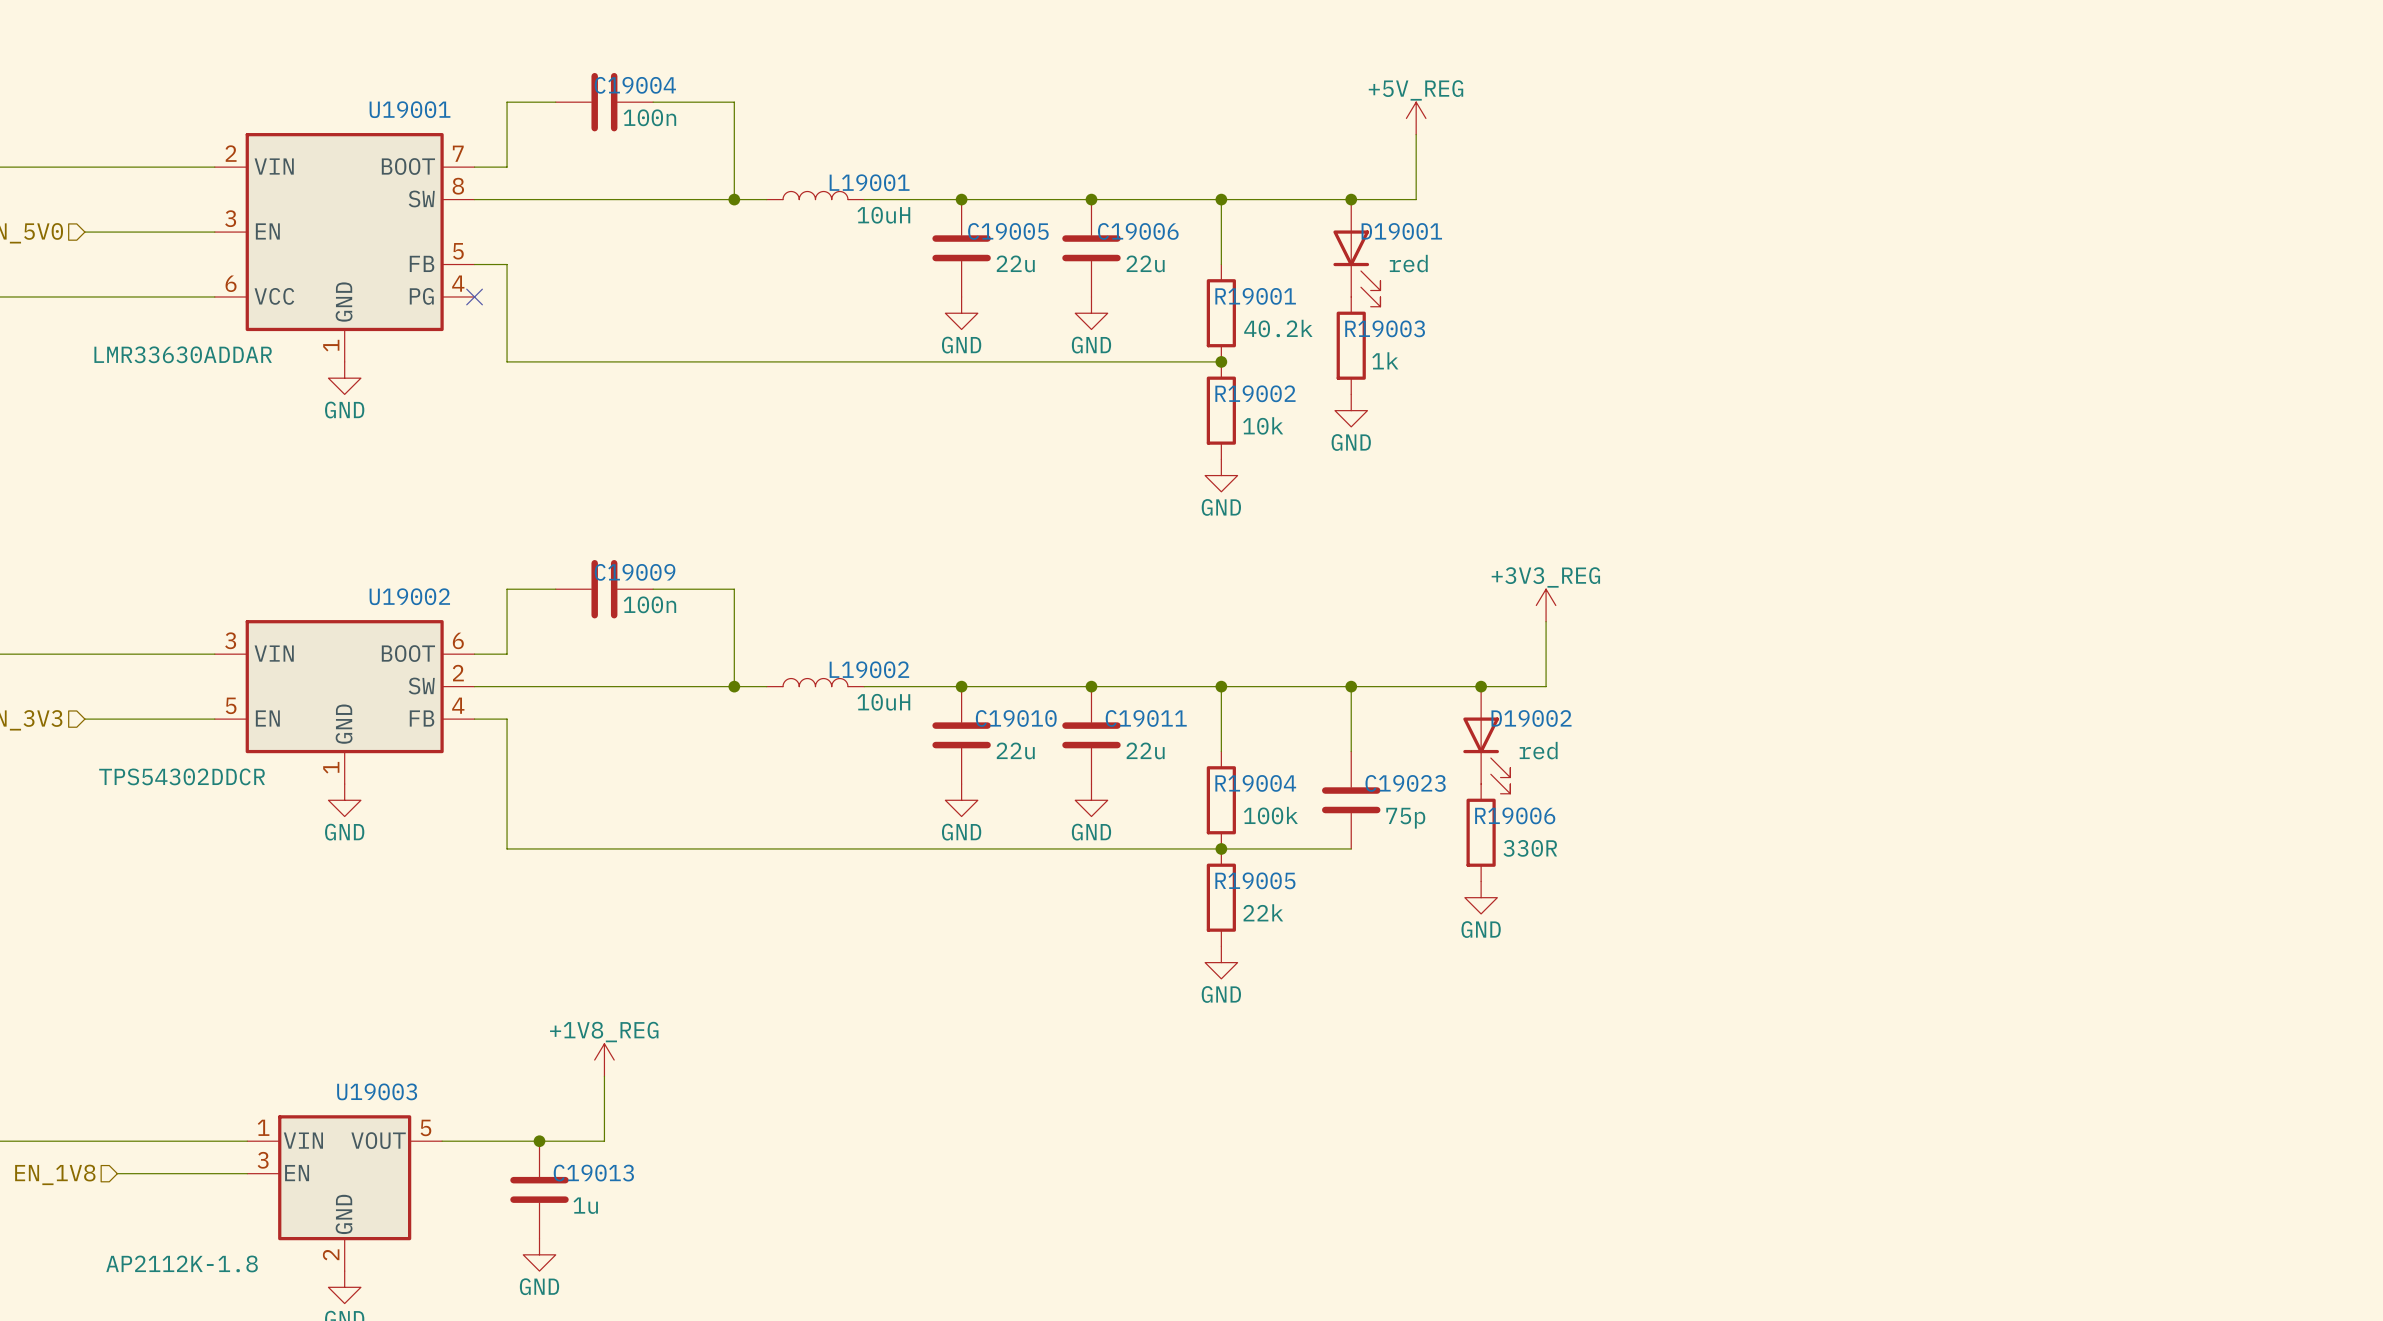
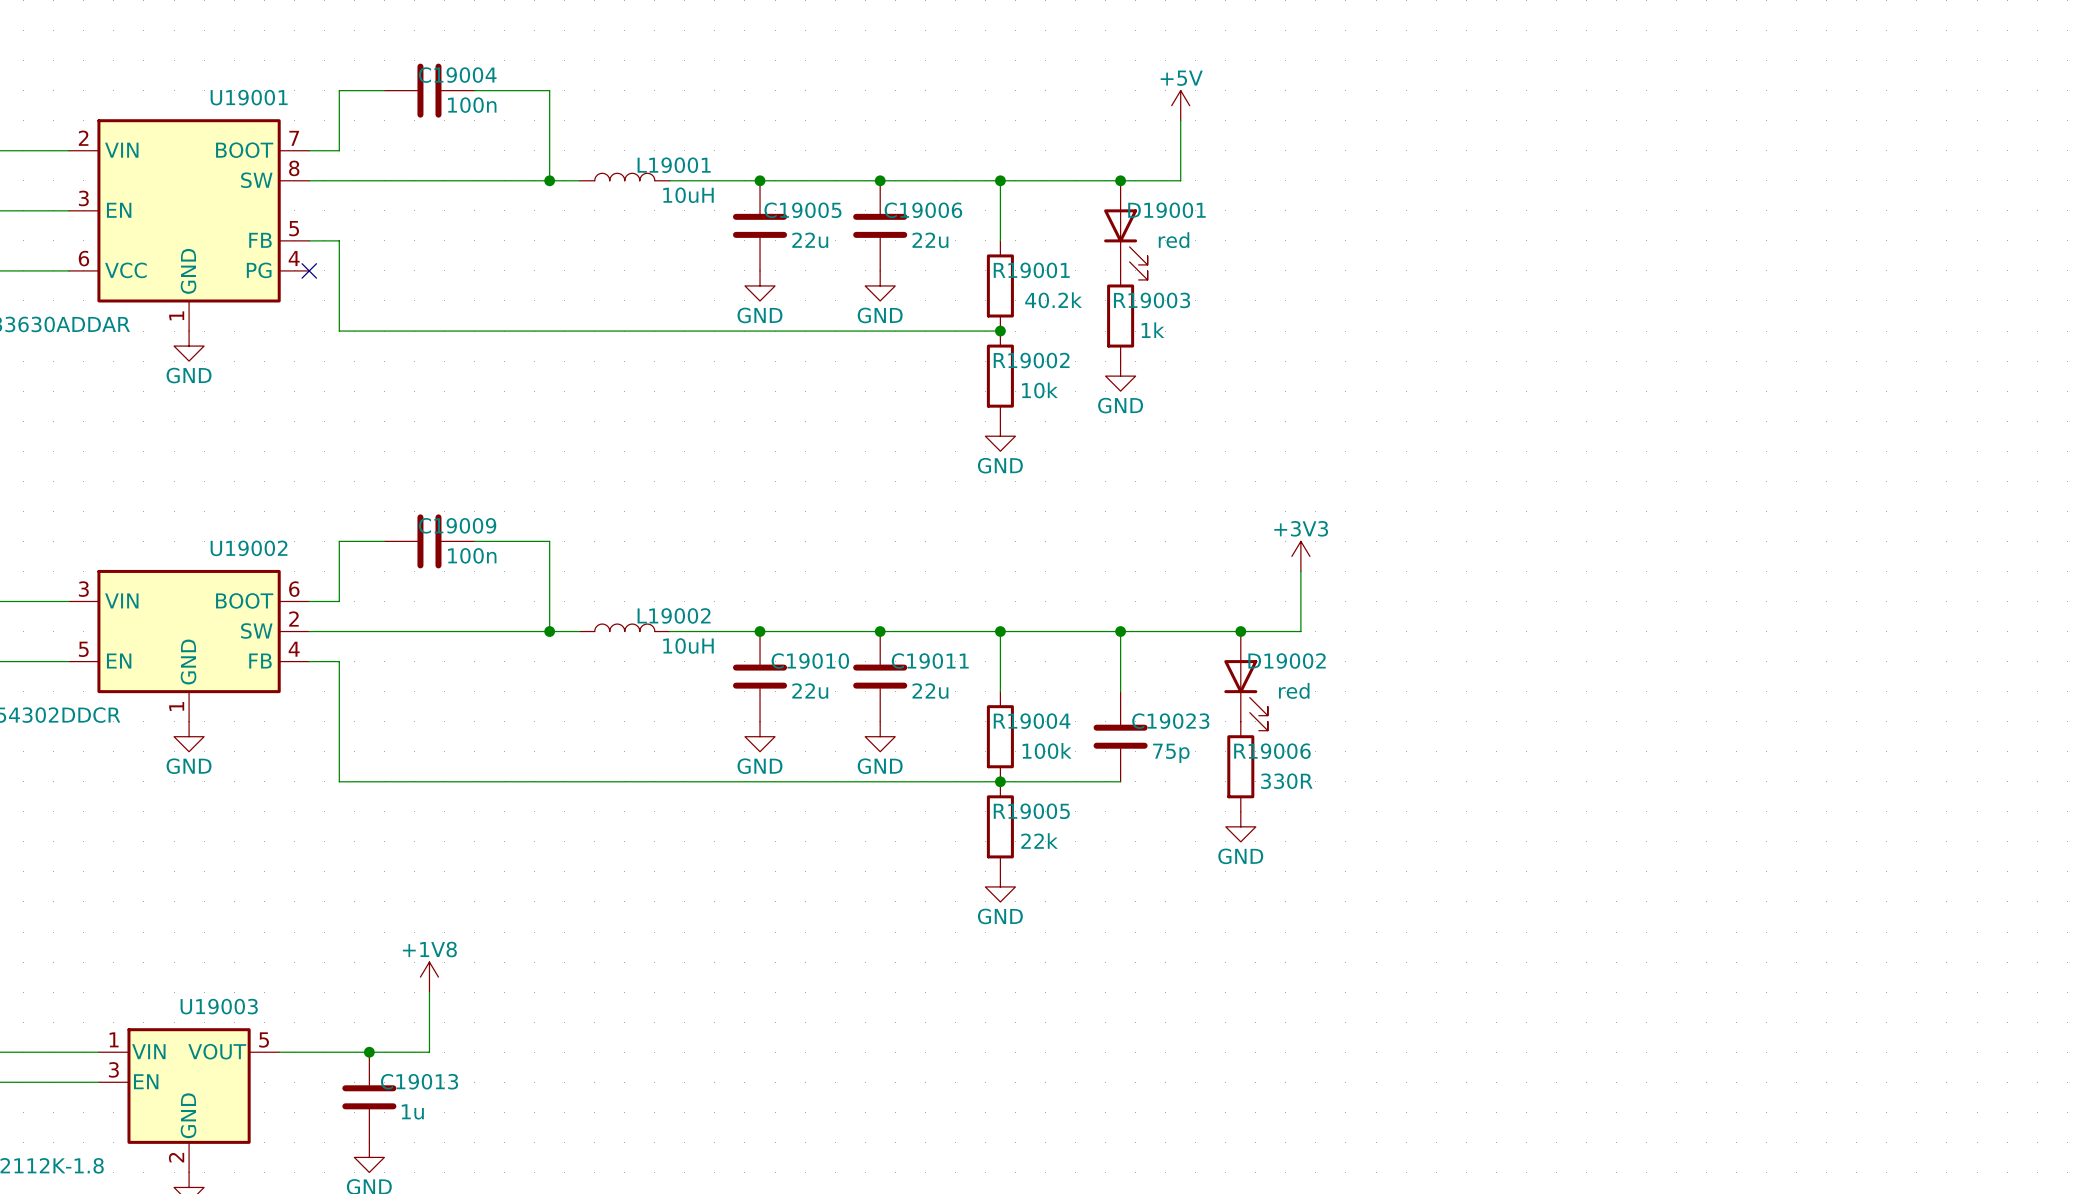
power symbol: +5V_REG (1416, 118) -> +5V (1180, 105)
power symbol: +3V3_REG (1546, 605) -> +3V3 (1300, 556)
power symbol: +1V8_REG (604, 1060) -> +1V8 (429, 977)

